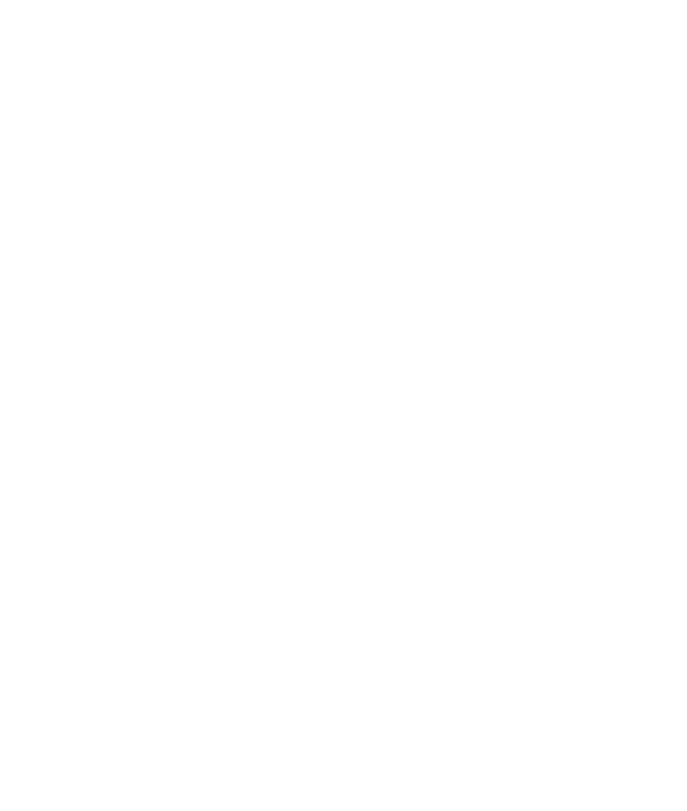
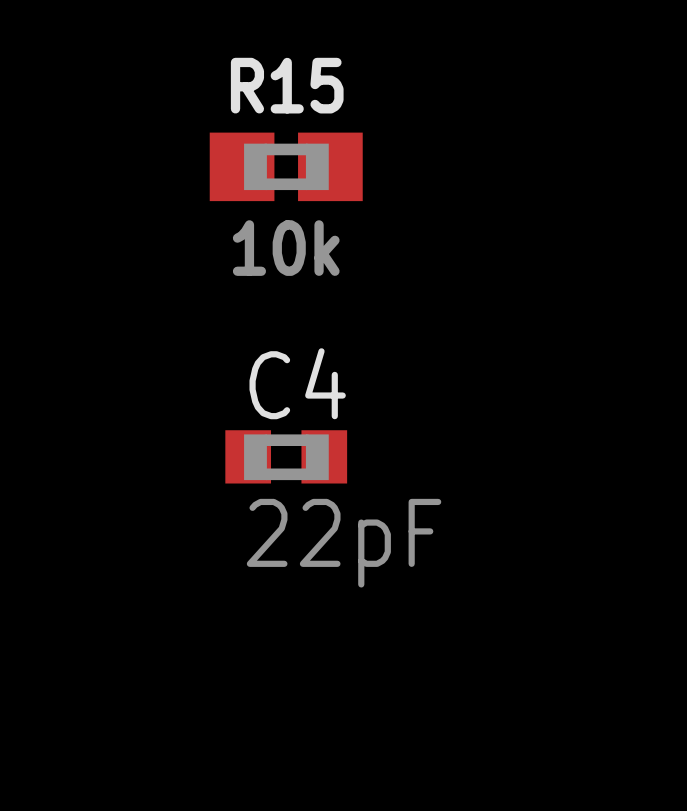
R15: none -> 10k (286, 166)
C4: none -> 22pF (286, 456)

